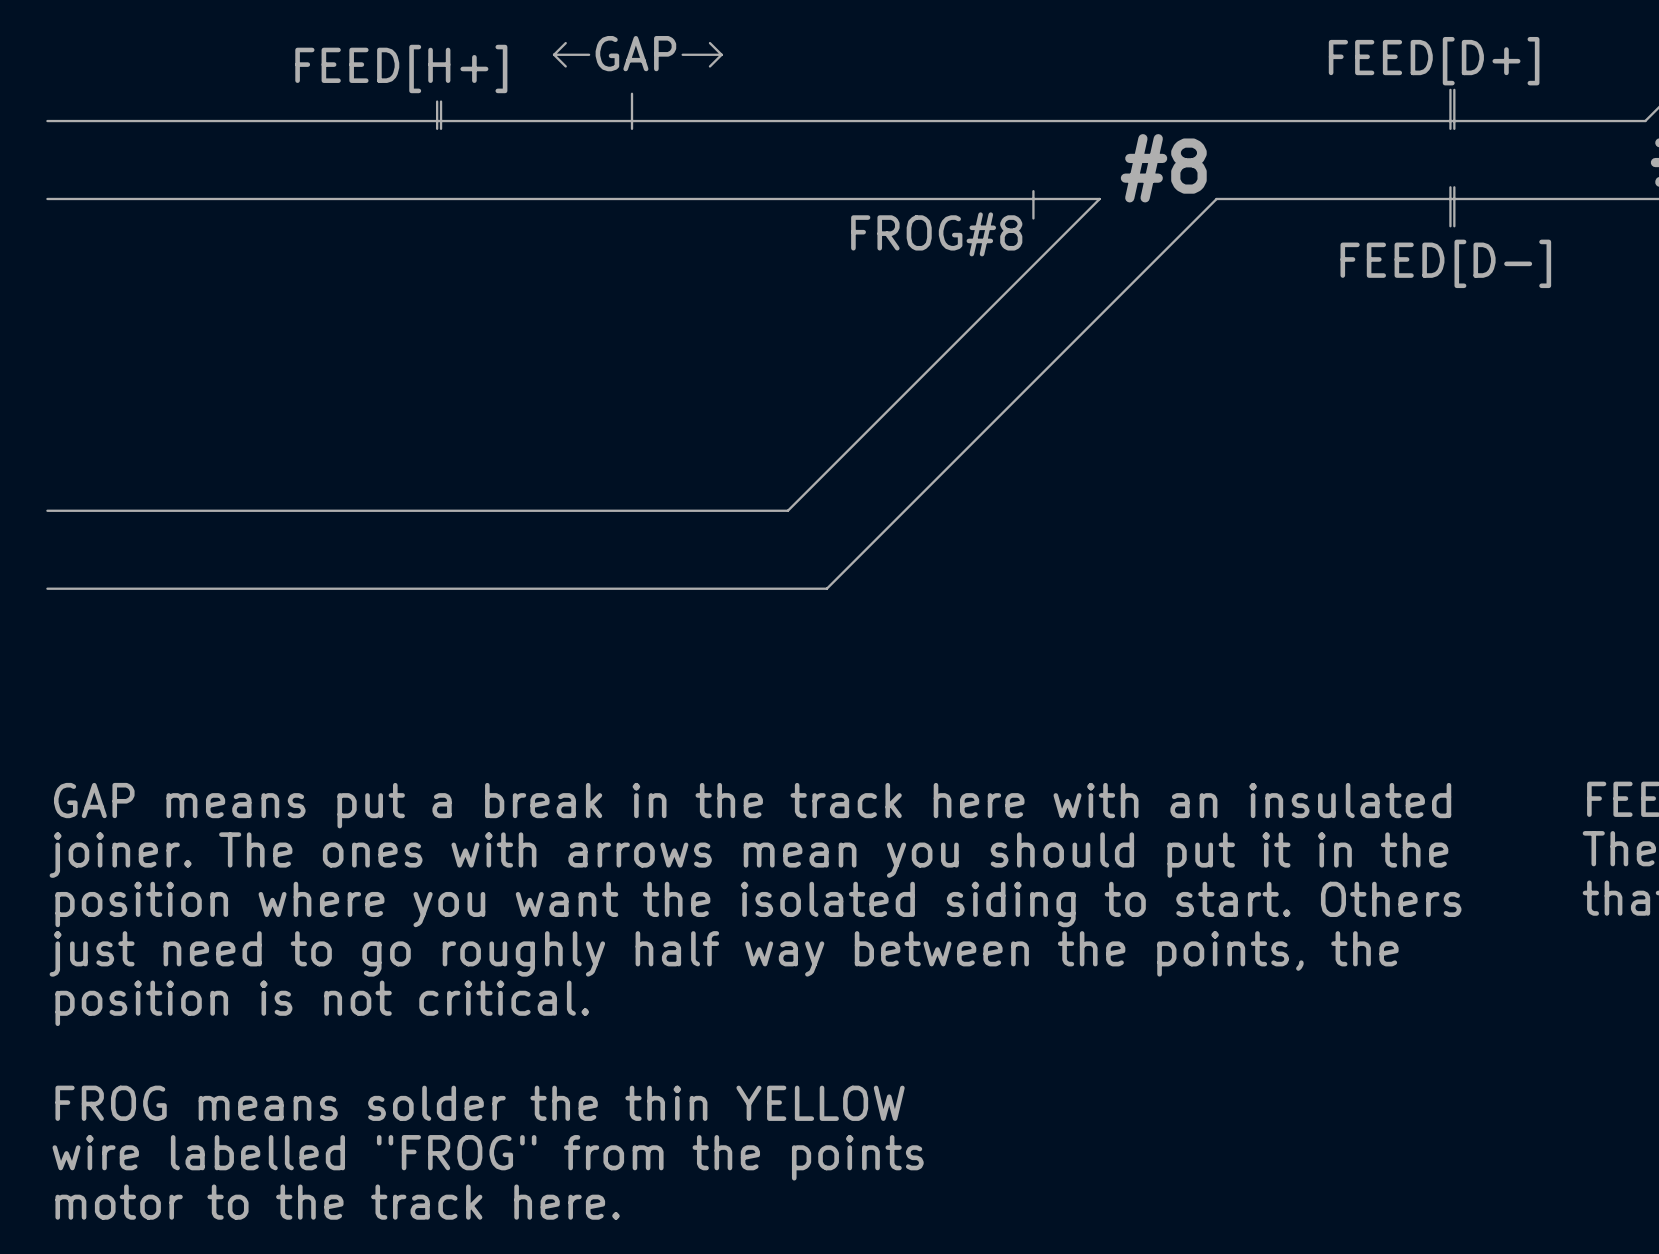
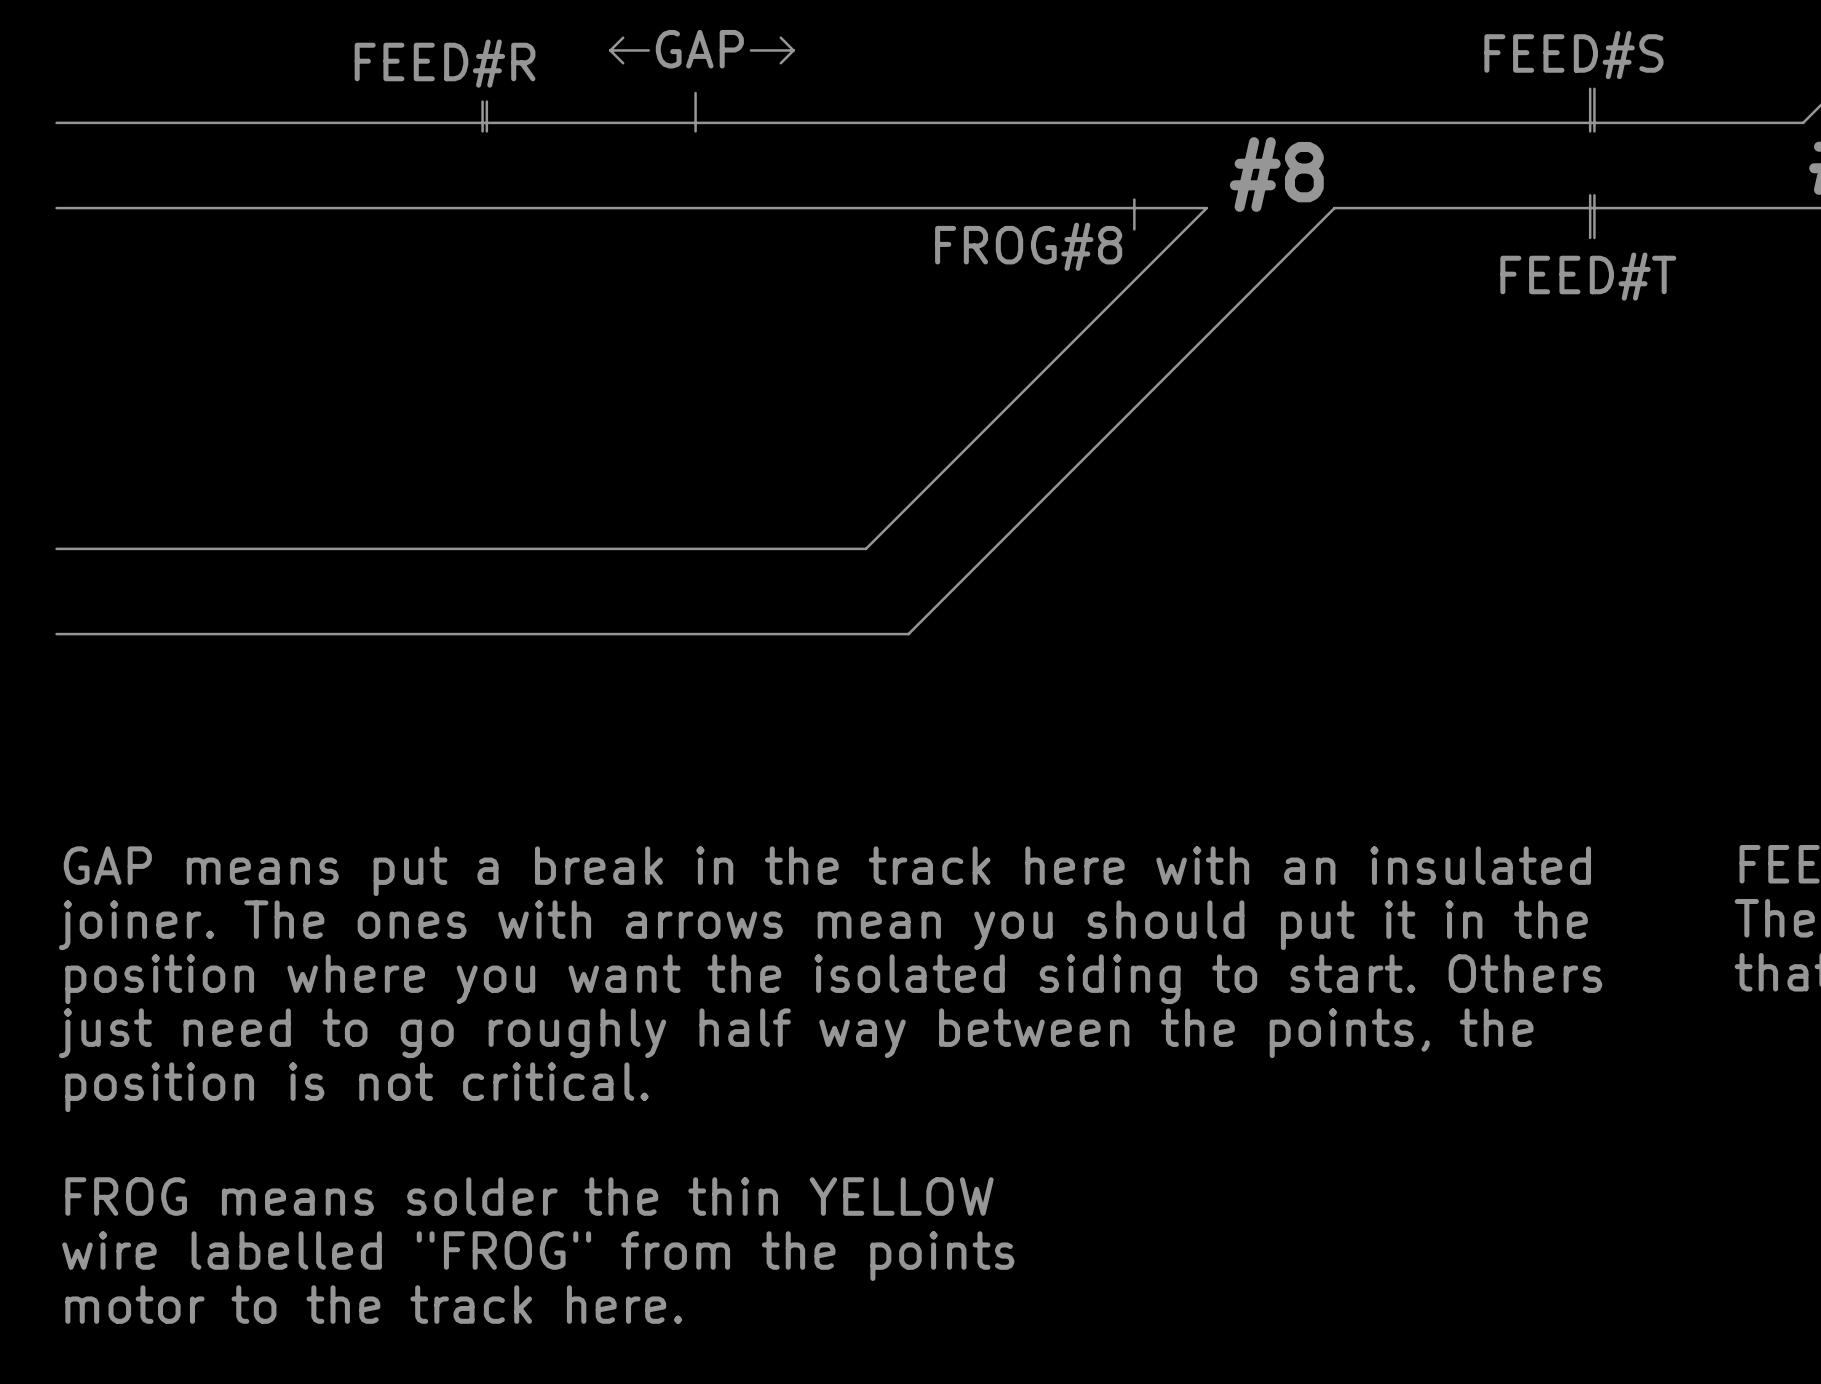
text: FEED[D+] (1434, 61) -> FEED#S (1573, 55)
text: FEED[H+] (401, 68) -> FEED#R (445, 63)
text: FEED[D-] (1445, 263) -> FEED#T (1588, 276)

